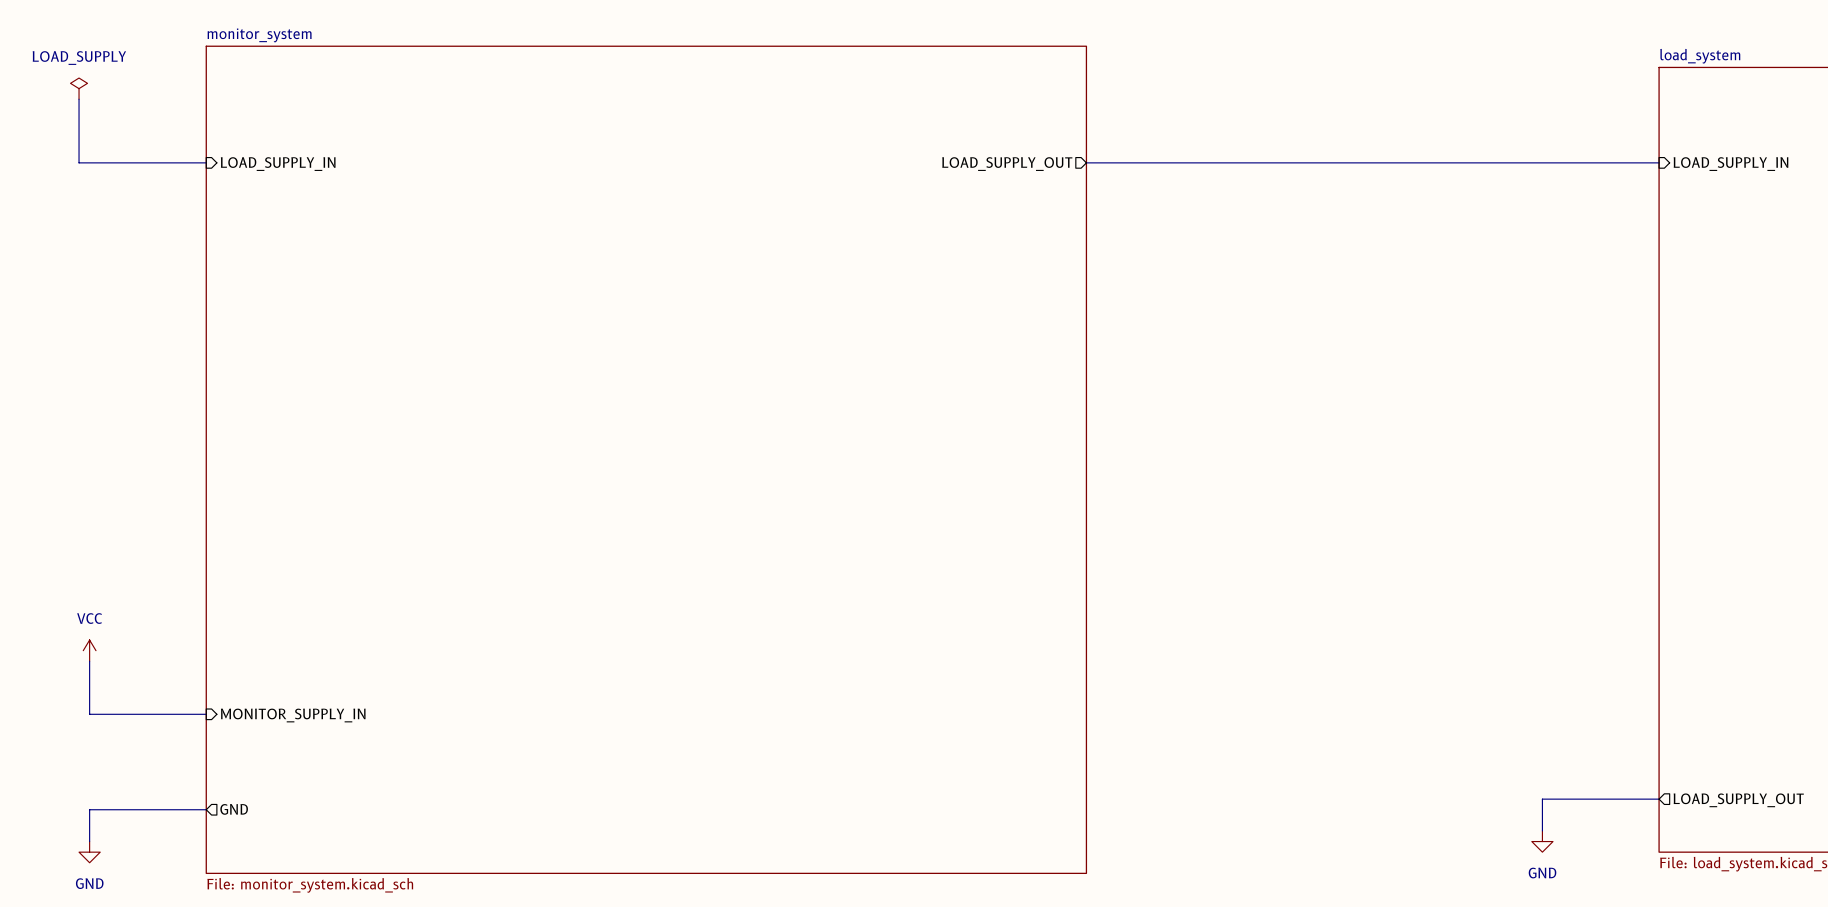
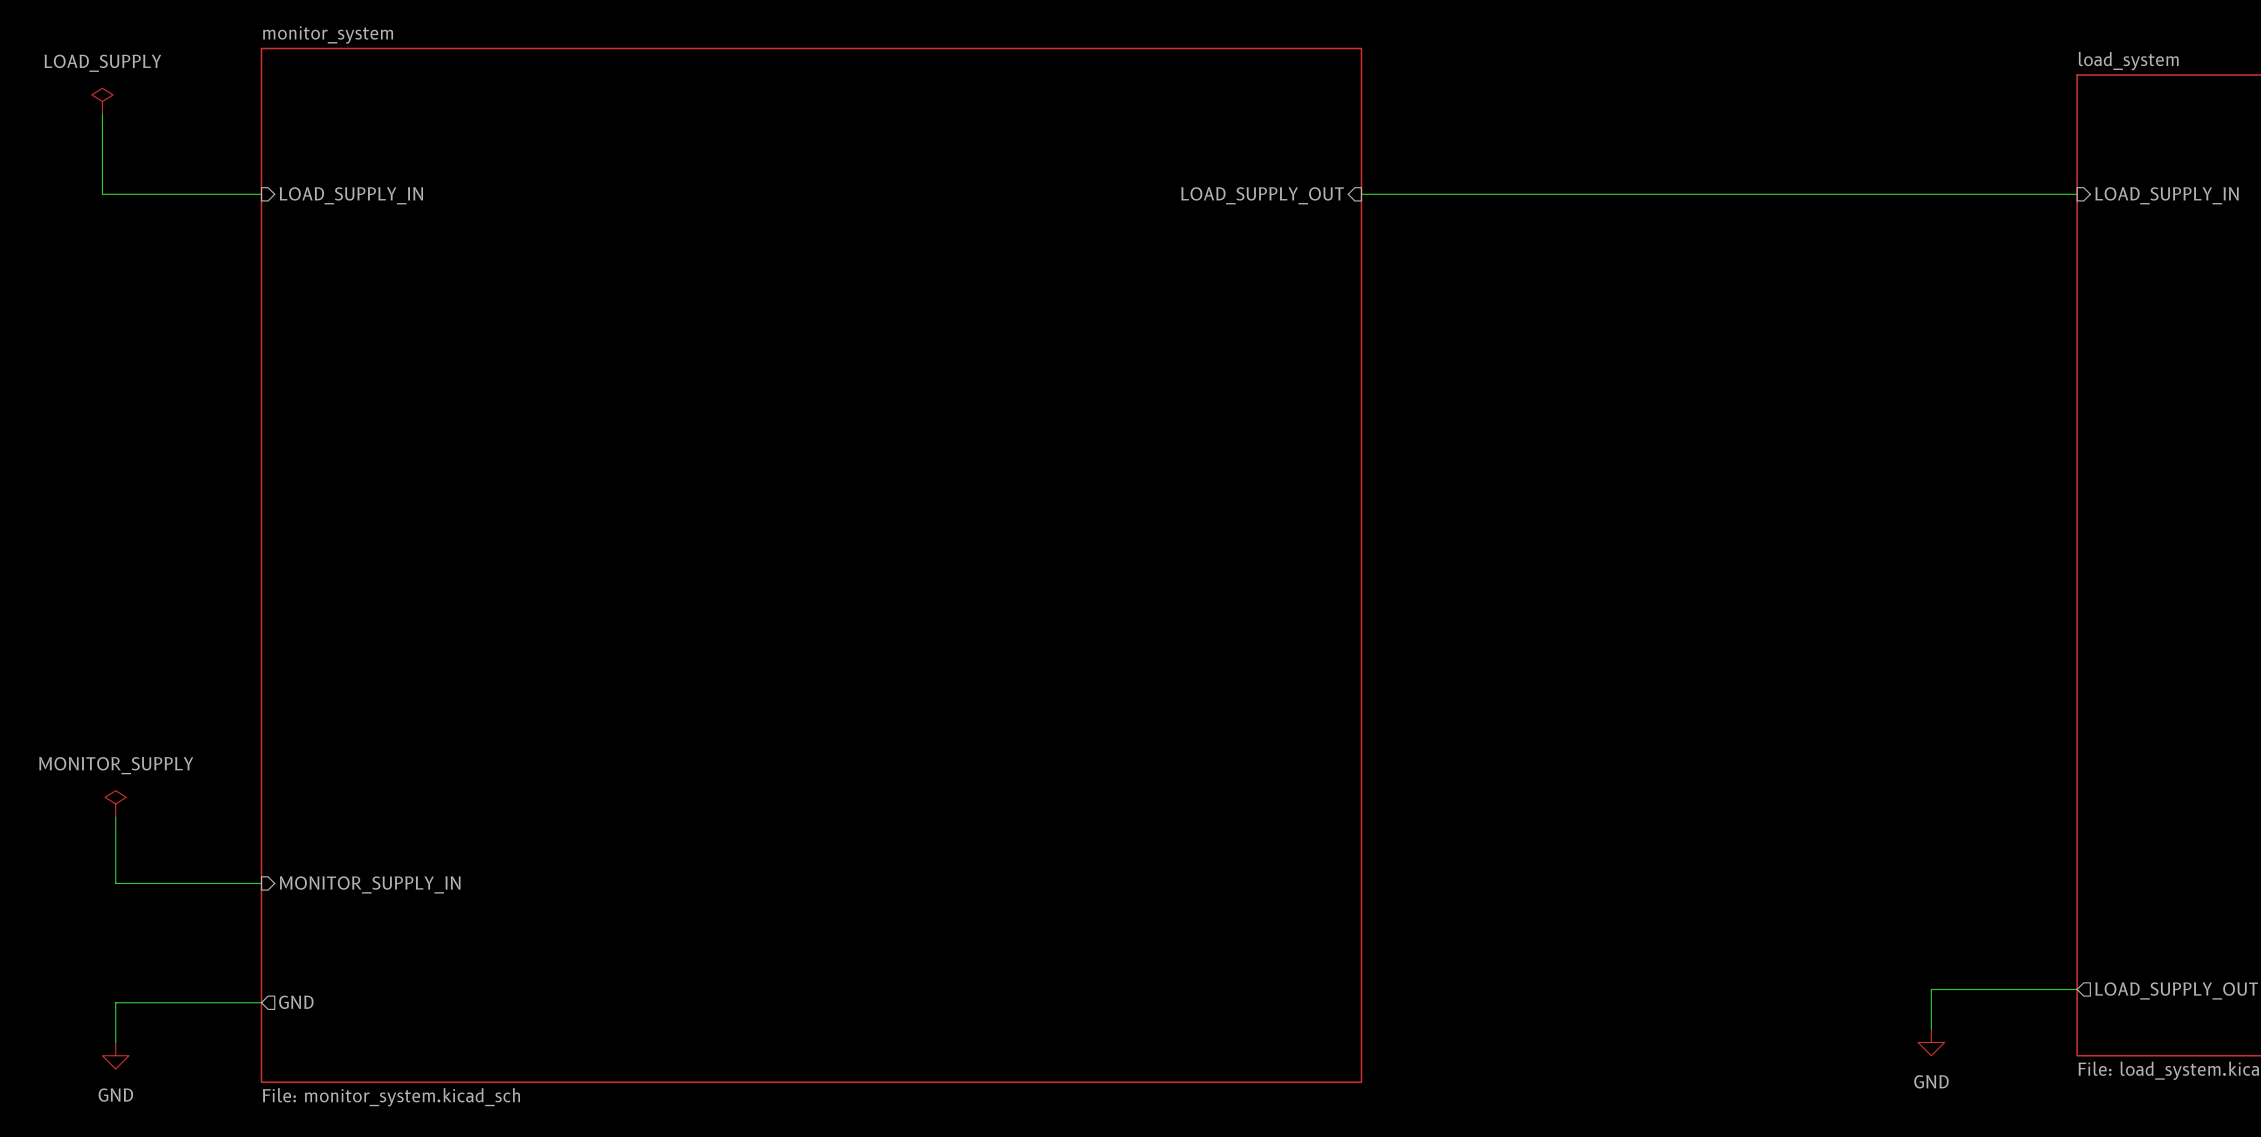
sheet pin shape: output (1007, 164) -> input (1262, 195)
power symbol: VCC (89, 650) -> MONITOR_SUPPLY (115, 803)

